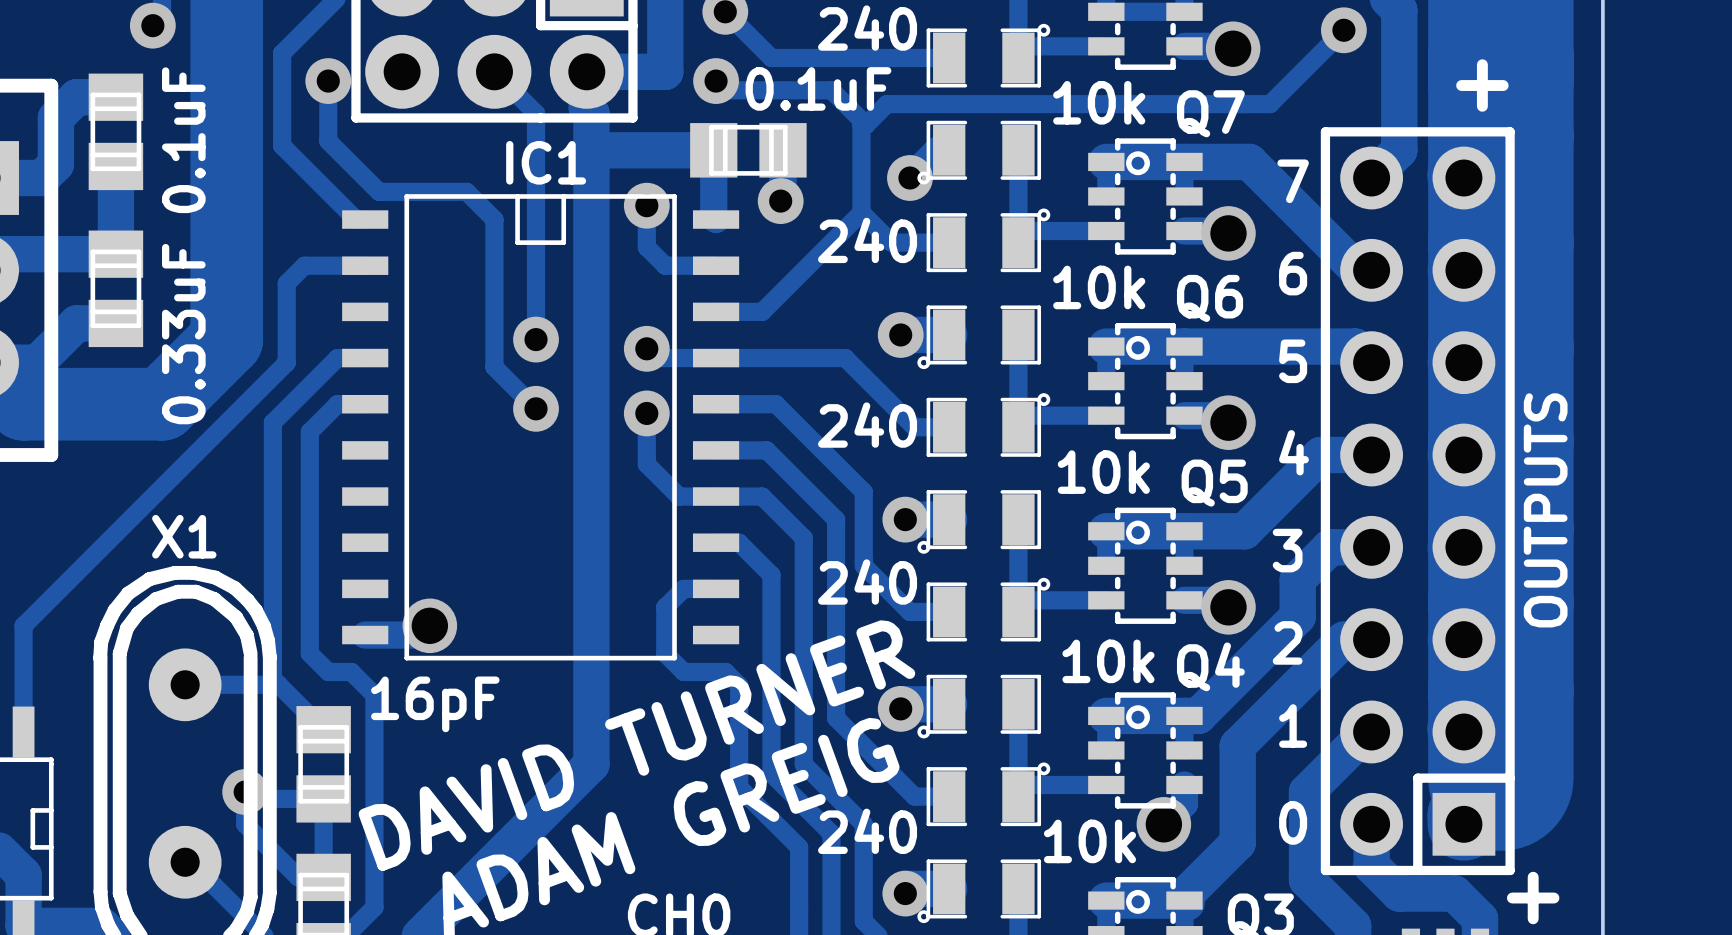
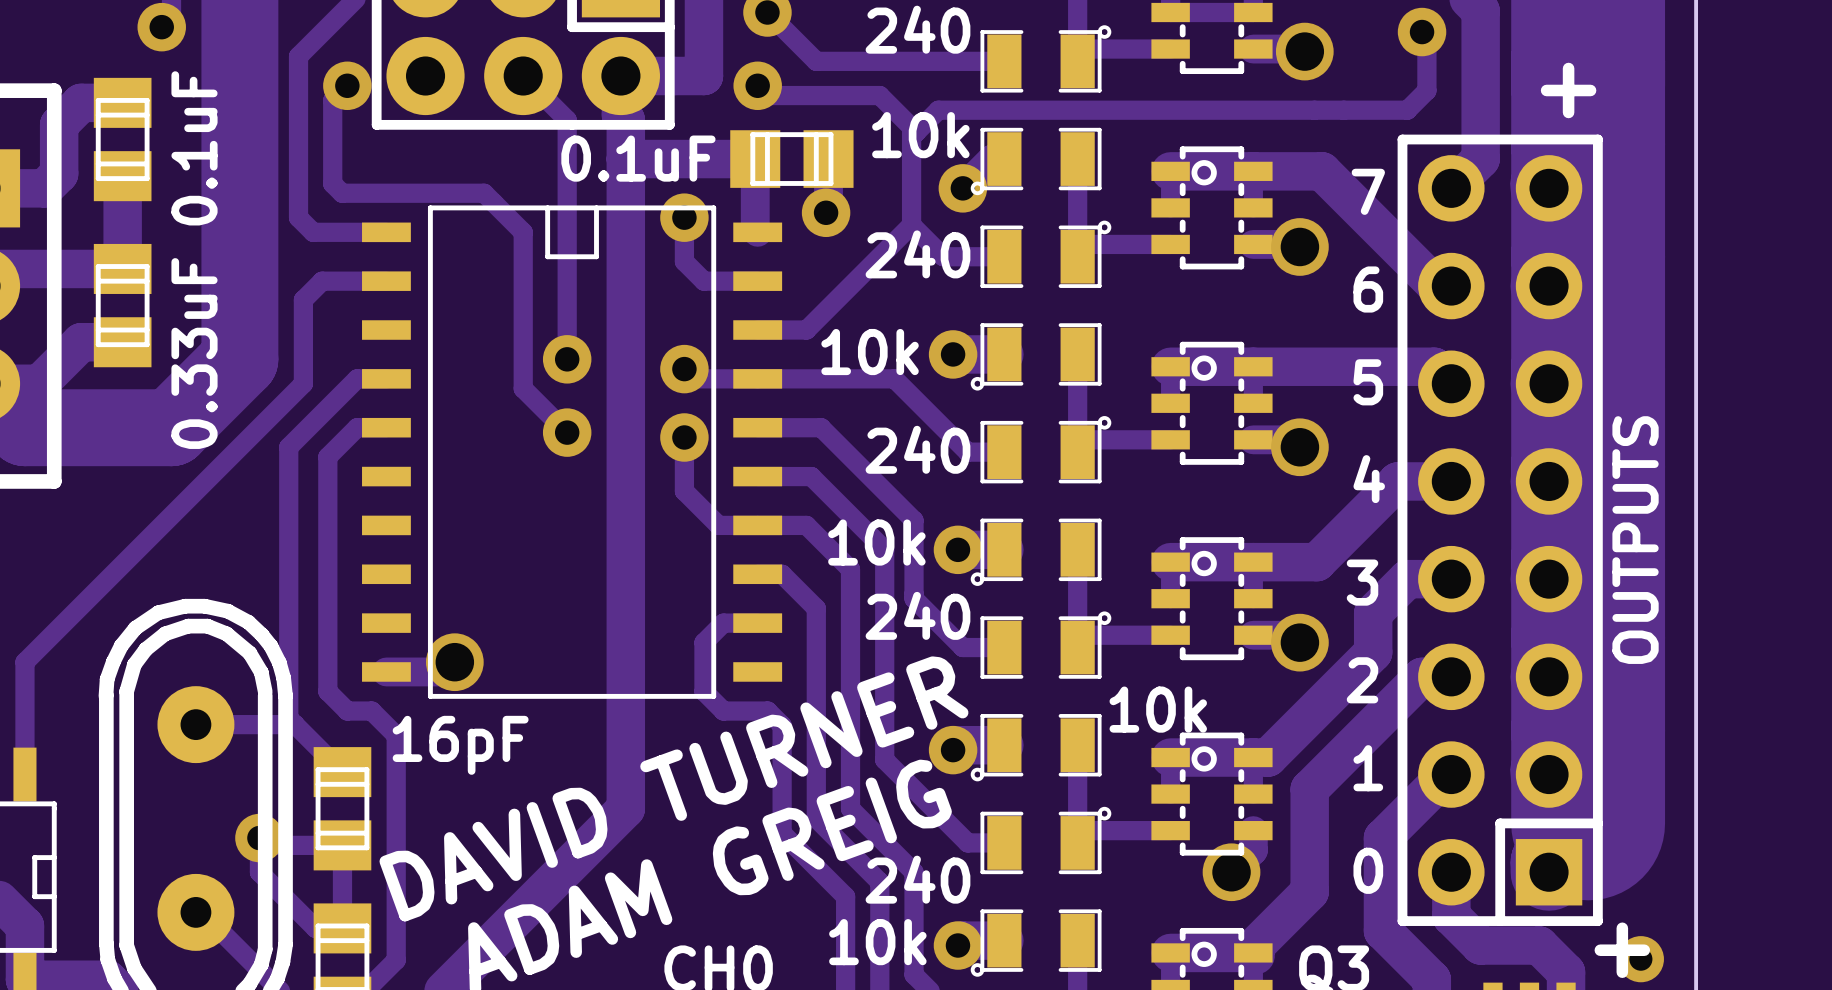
track: (1343, 30) (1270, 104) -> (1422, 32) (1426, 36) (1426, 90) (1407, 110) (1343, 110)
track: (328, 81) (328, 141) (379, 191) (466, 191) -> (347, 85) (332, 100) (332, 183) (342, 193) (484, 193) (493, 203)
part value position: 0.1uF (818, 88) -> 0.1uF (638, 158)
part value position: 10k (1099, 102) -> 10k (920, 135)
Q7 name: Q7 (1210, 113) -> none
track: (282, 145) (355, 219) -> (298, 154) (298, 217) (313, 232) (376, 232)
IC1 name: IC1 (546, 162) -> none
part value position: 10k (1099, 287) -> 10k (870, 352)
Q6 name: Q6 (1210, 298) -> none
part value position: 10k (1103, 472) -> 10k (876, 542)
Q5 name: Q5 (1214, 483) -> none
X1 name: X1 (184, 536) -> none
part value position: 10k (1108, 661) -> 10k (1158, 709)
Q4 name: Q4 (1210, 666) -> none
part value position: 10k (1090, 841) -> 10k (877, 942)
via: none -> (1640, 959)

